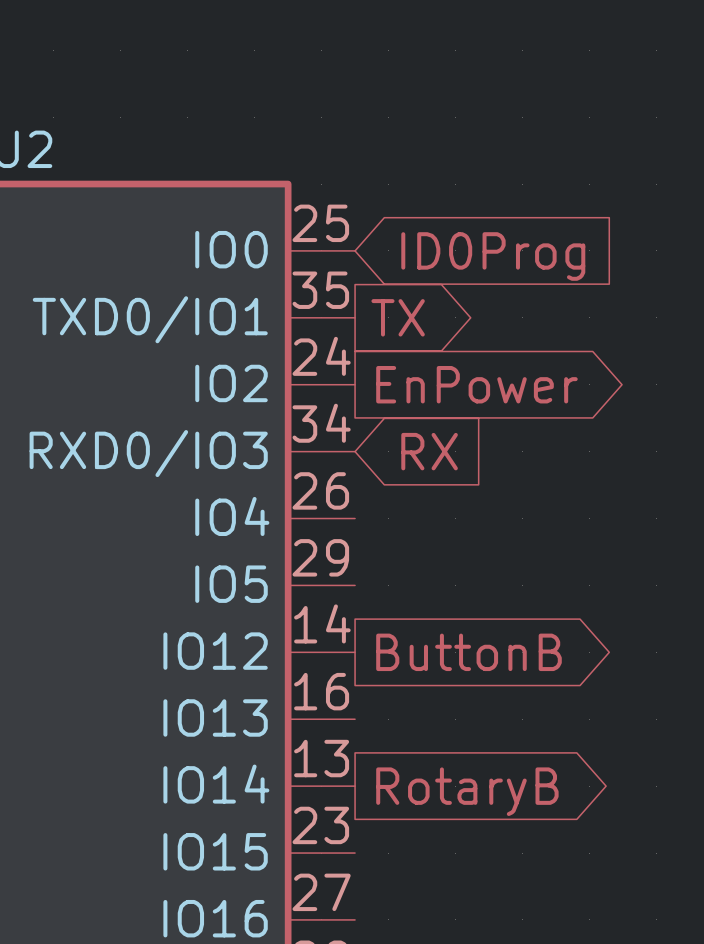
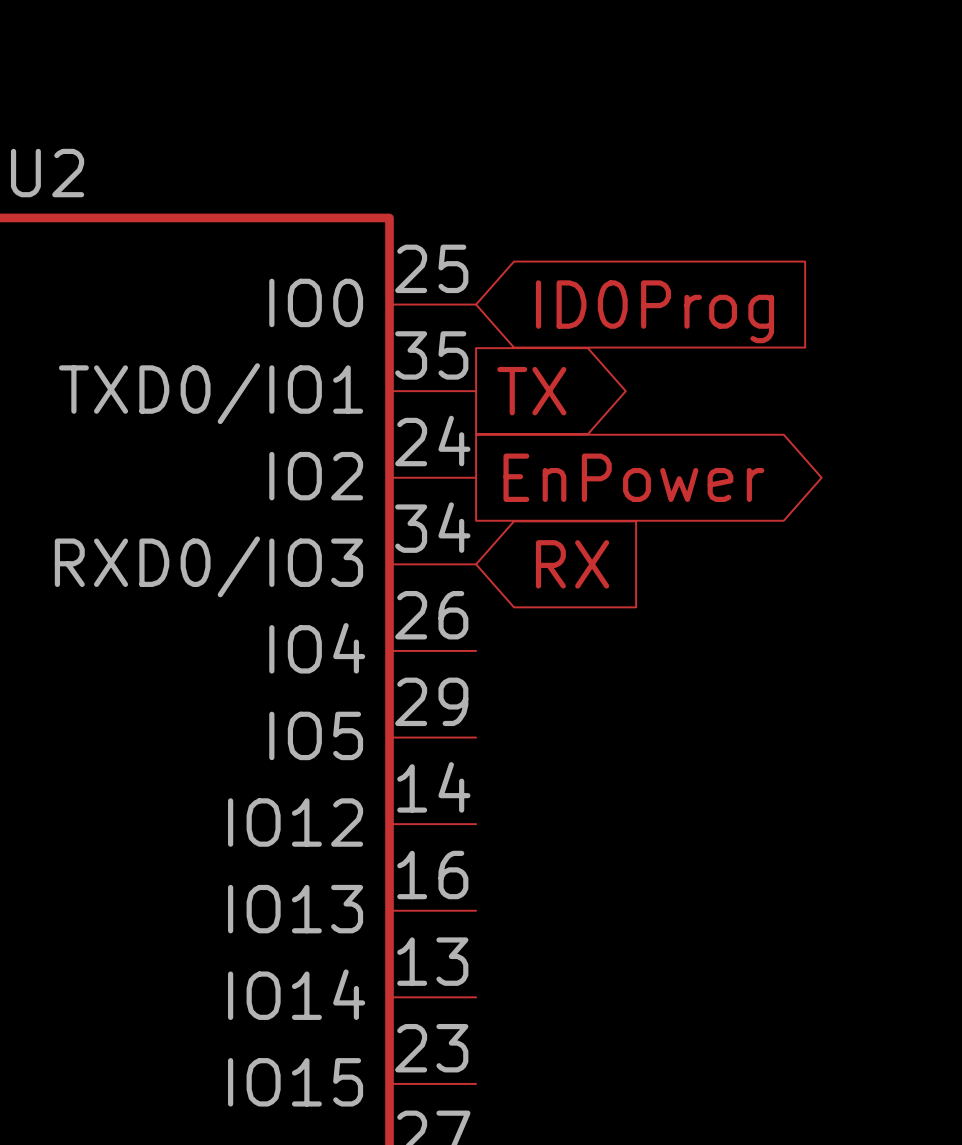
global label: ButtonB (468, 652) -> none
global label: RotaryB (467, 791) -> none

